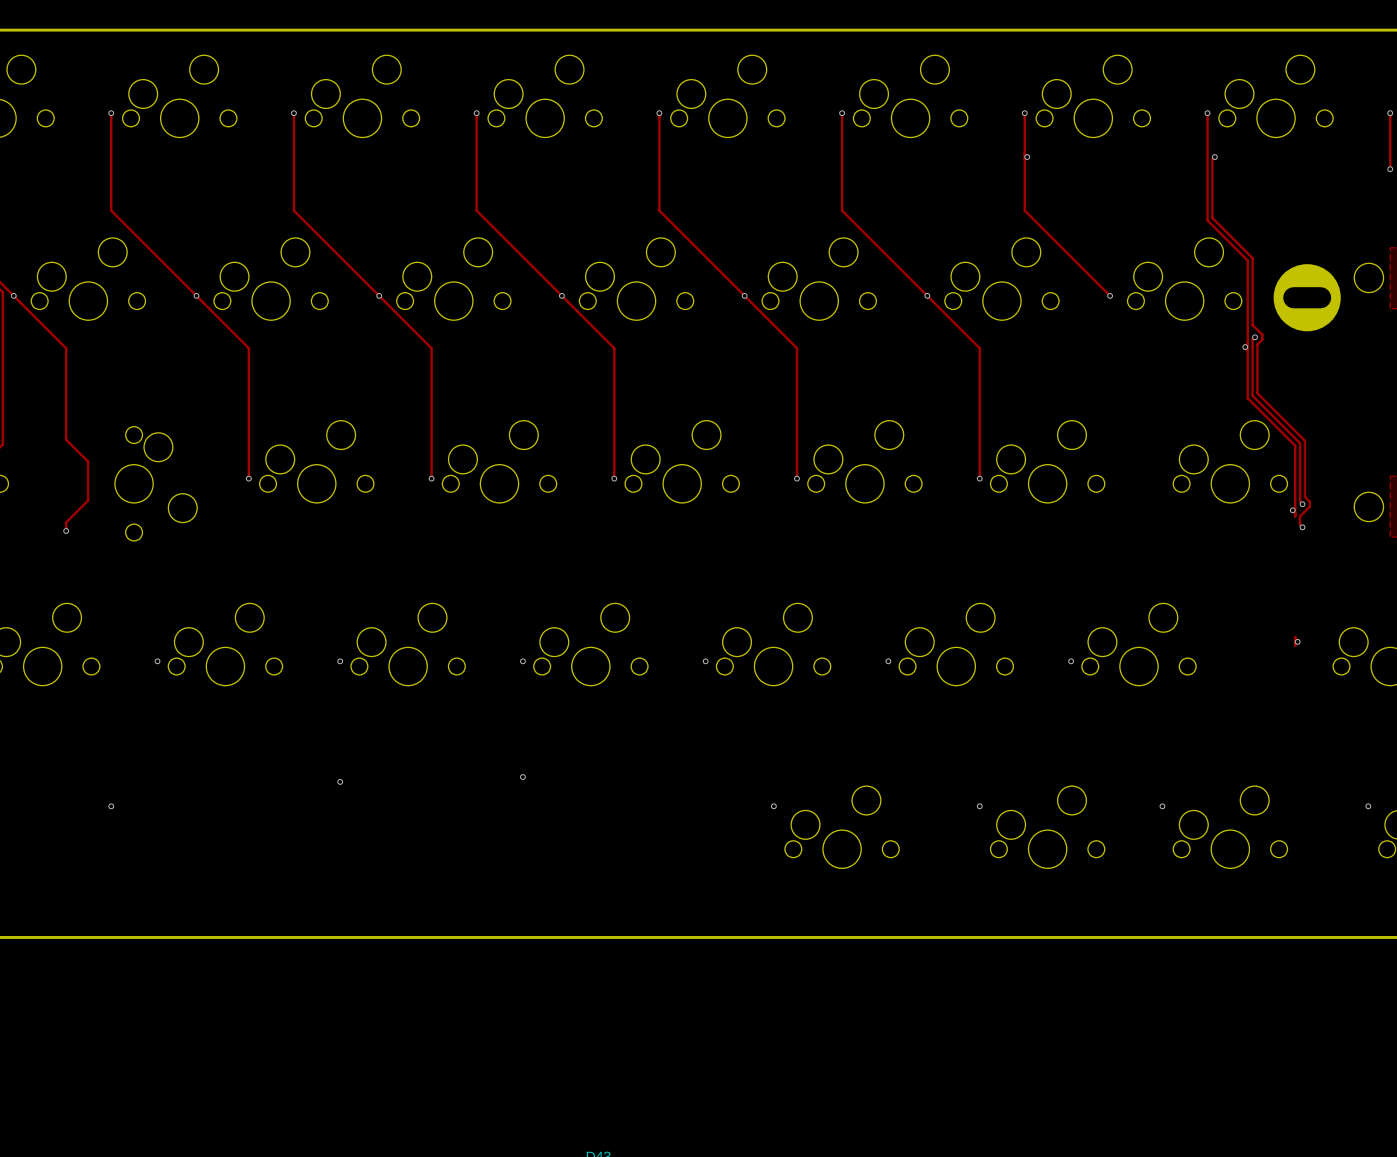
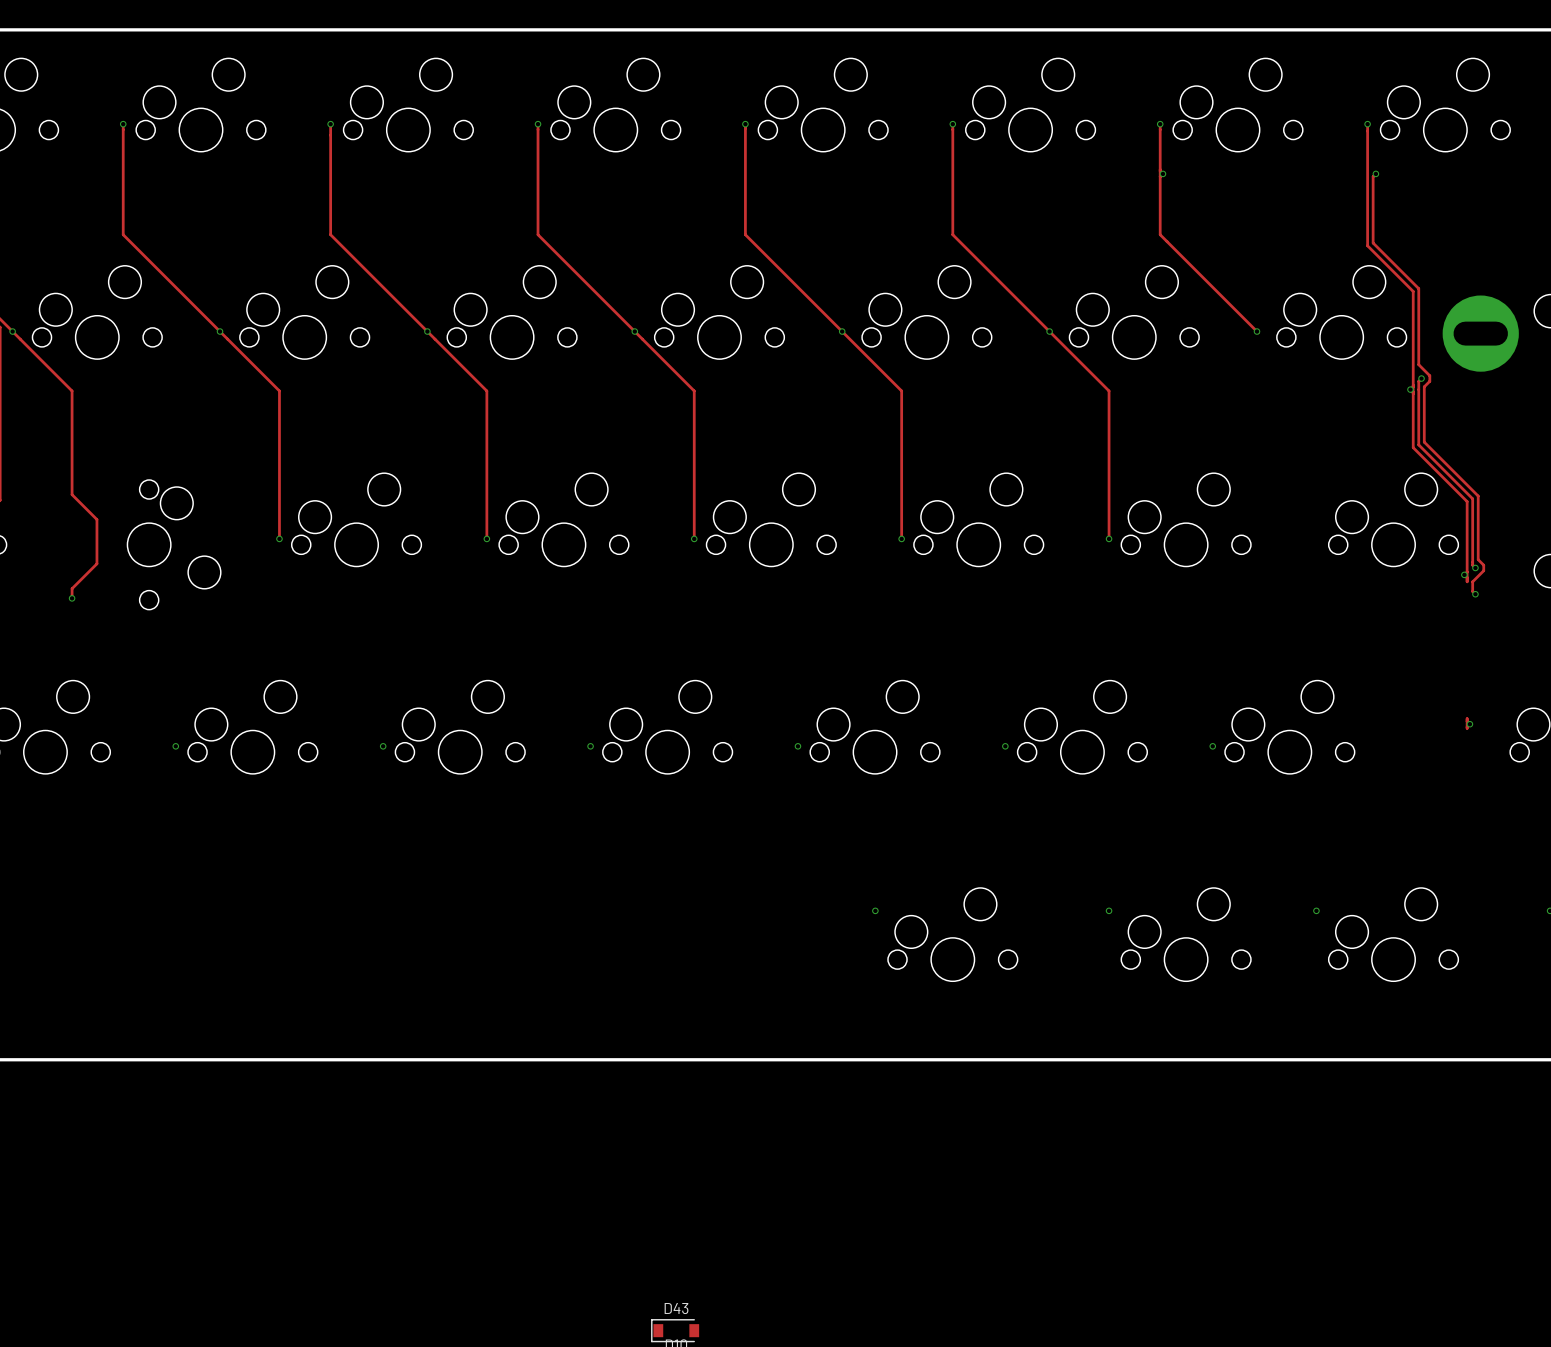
via: (522, 777) -> none
via: (340, 781) -> none
via: (111, 806) -> none

